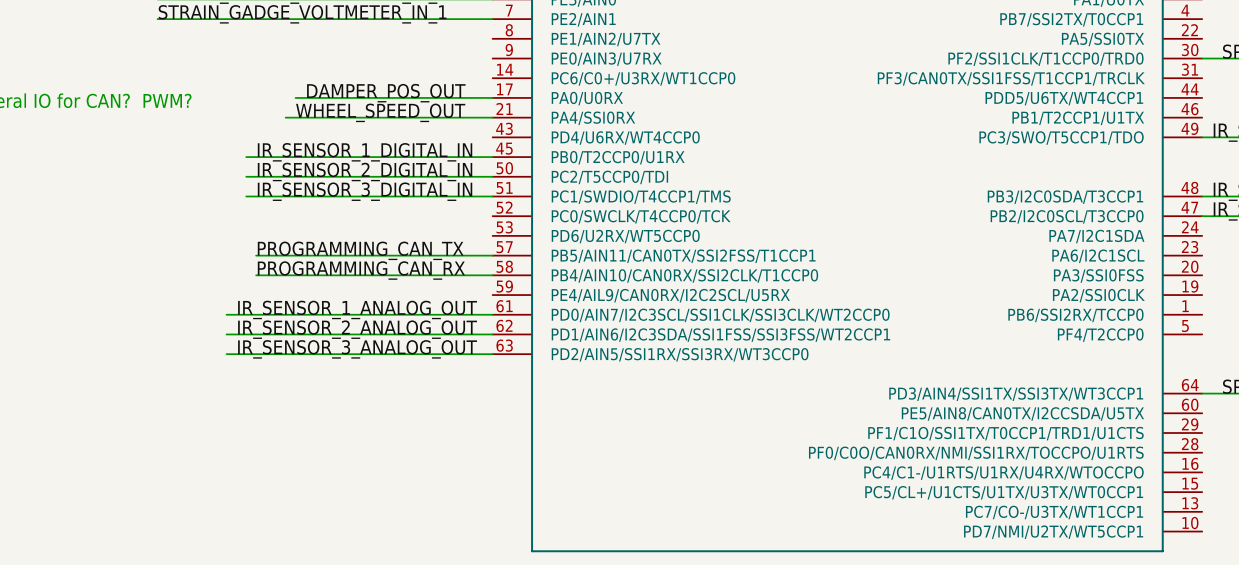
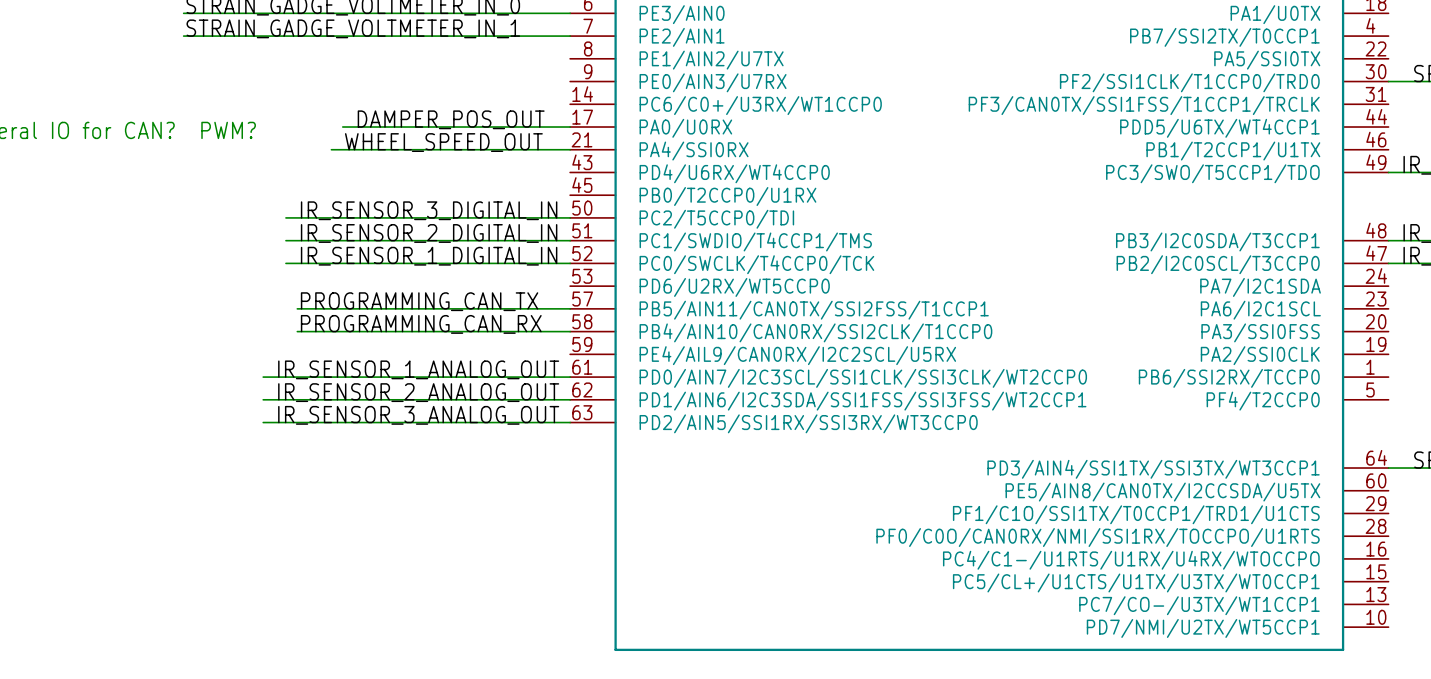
label position: IR_SENSOR_1_DIGITAL_IN (365, 152) -> IR_SENSOR_1_DIGITAL_IN (429, 256)
wire: (246, 157) (492, 157) -> (285, 263) (570, 263)
label: IR_SENSOR_2_DIGITAL_IN (365, 171) -> IR_SENSOR_3_DIGITAL_IN (429, 210)
label: IR_SENSOR_3_DIGITAL_IN (365, 191) -> IR_SENSOR_2_DIGITAL_IN (429, 233)

